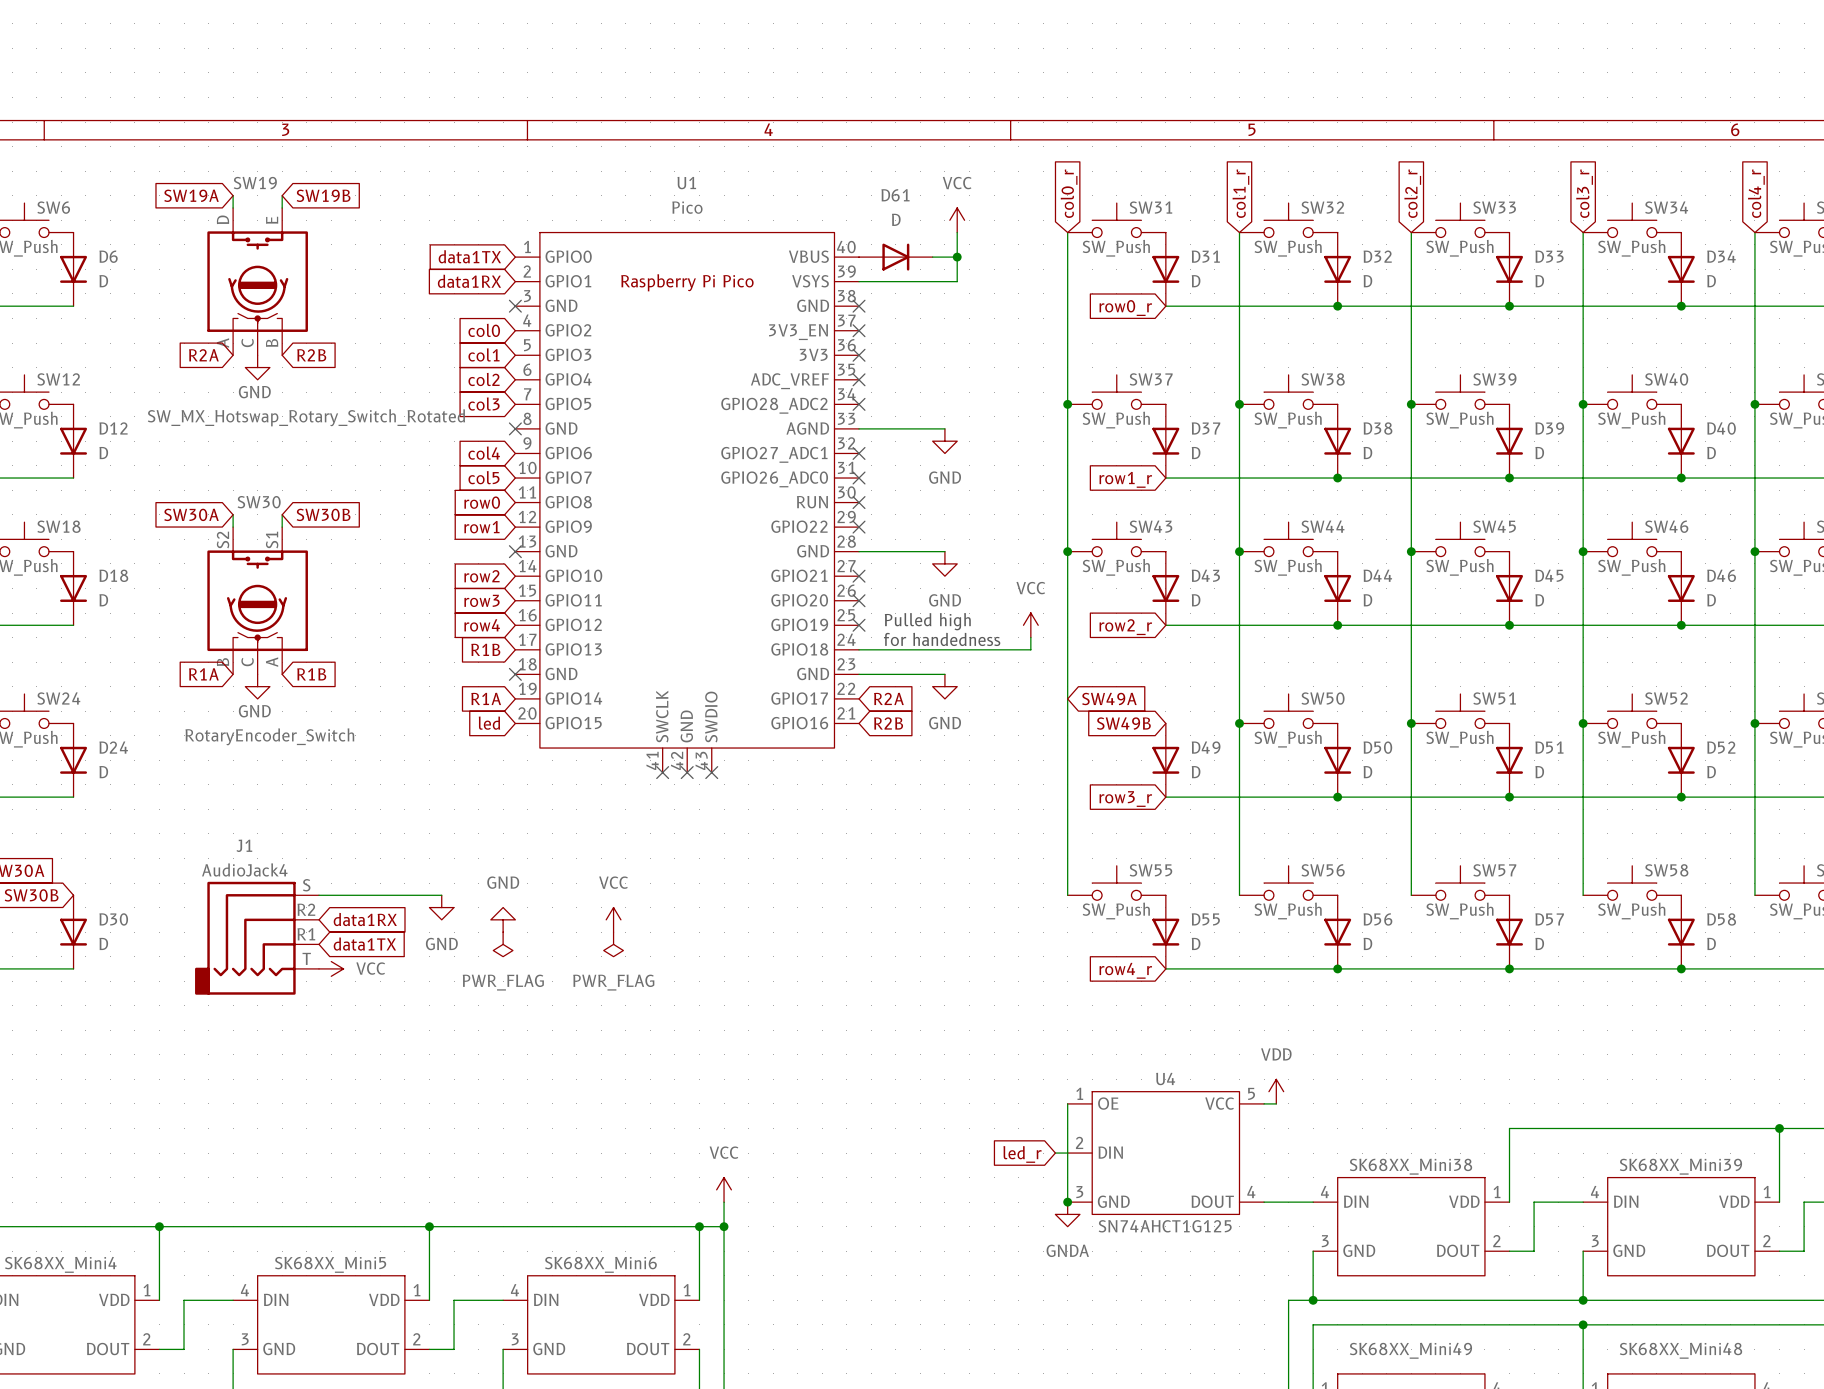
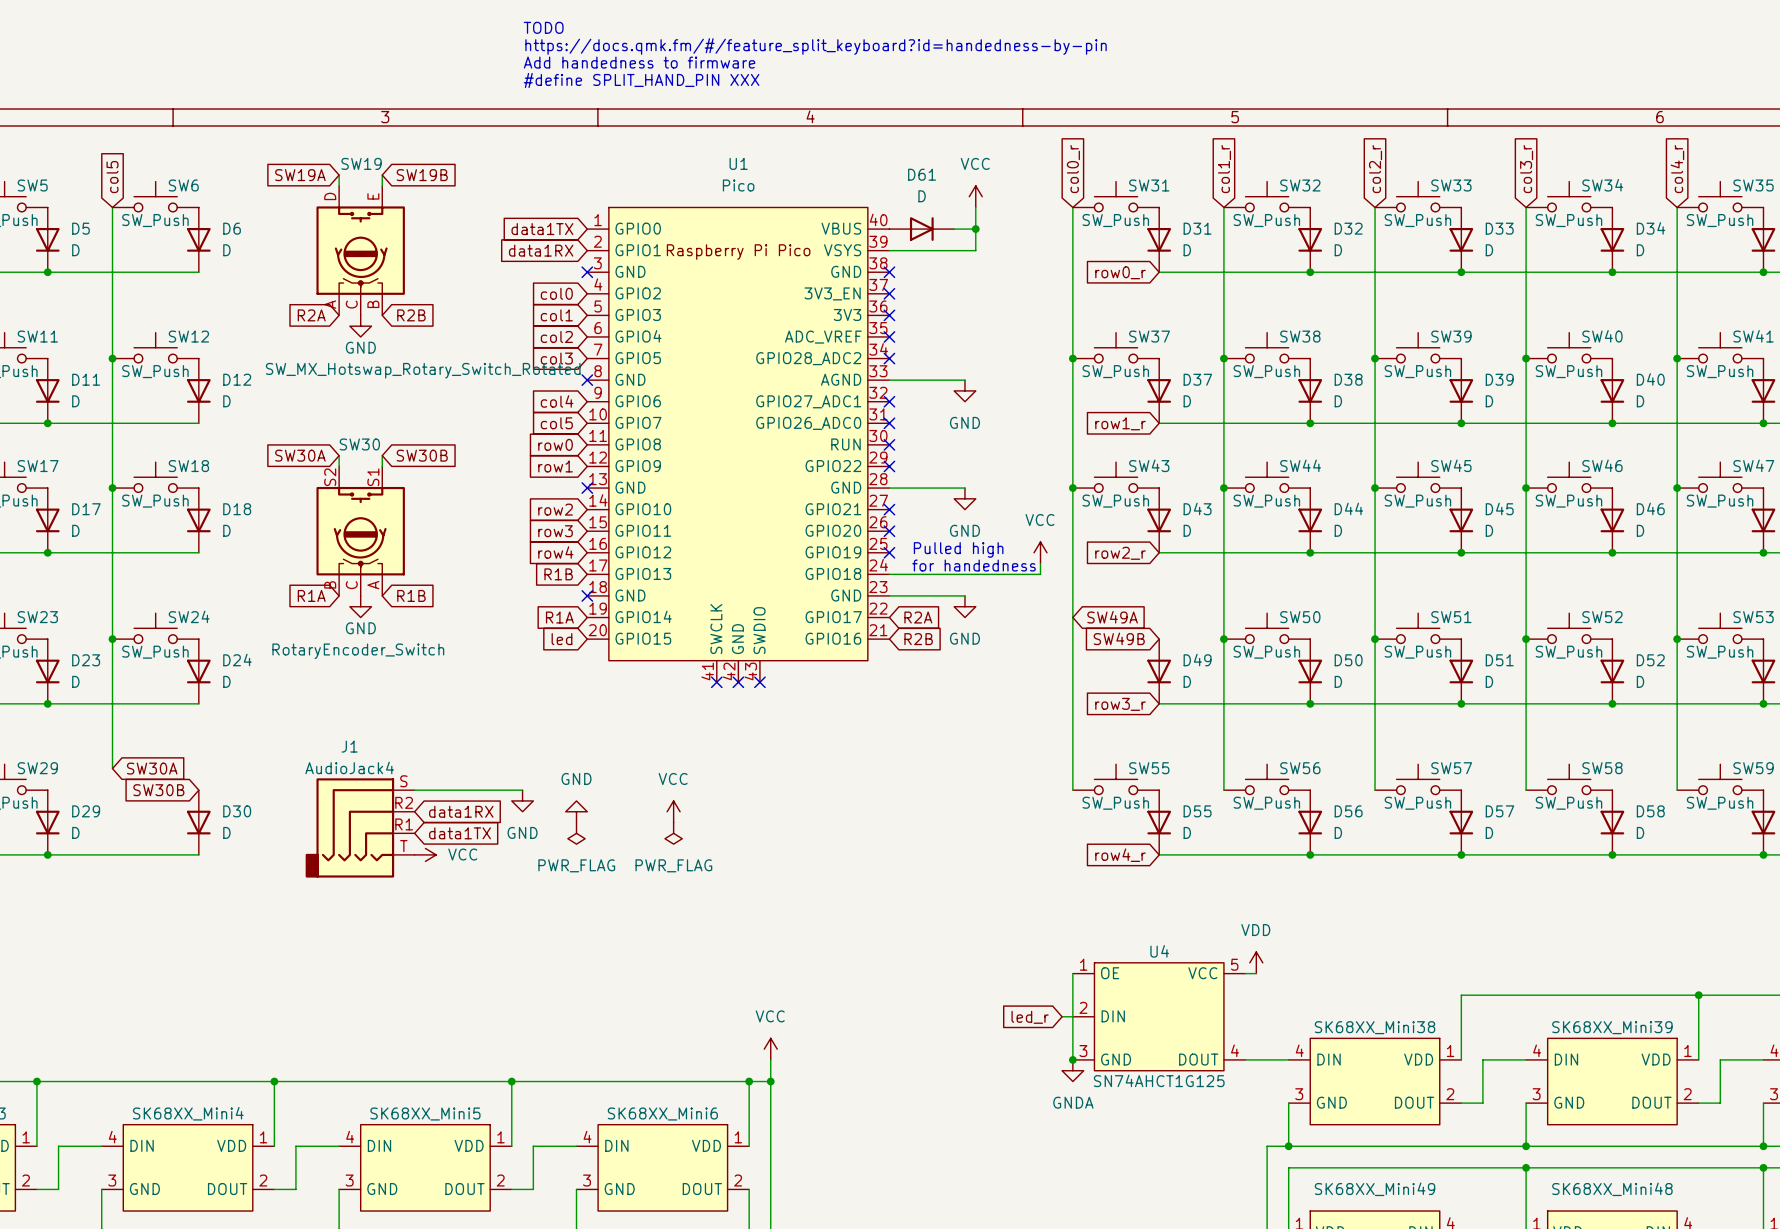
text: none -> TODO (543, 27)
text: none -> https://docs.qmk.fm/#/feature_split_keyboard?id=handedness-by-pin (816, 46)
text: none -> Add handedness to firmware (639, 62)
text: none -> #define SPLIT_HAND_PIN XXX (641, 80)

